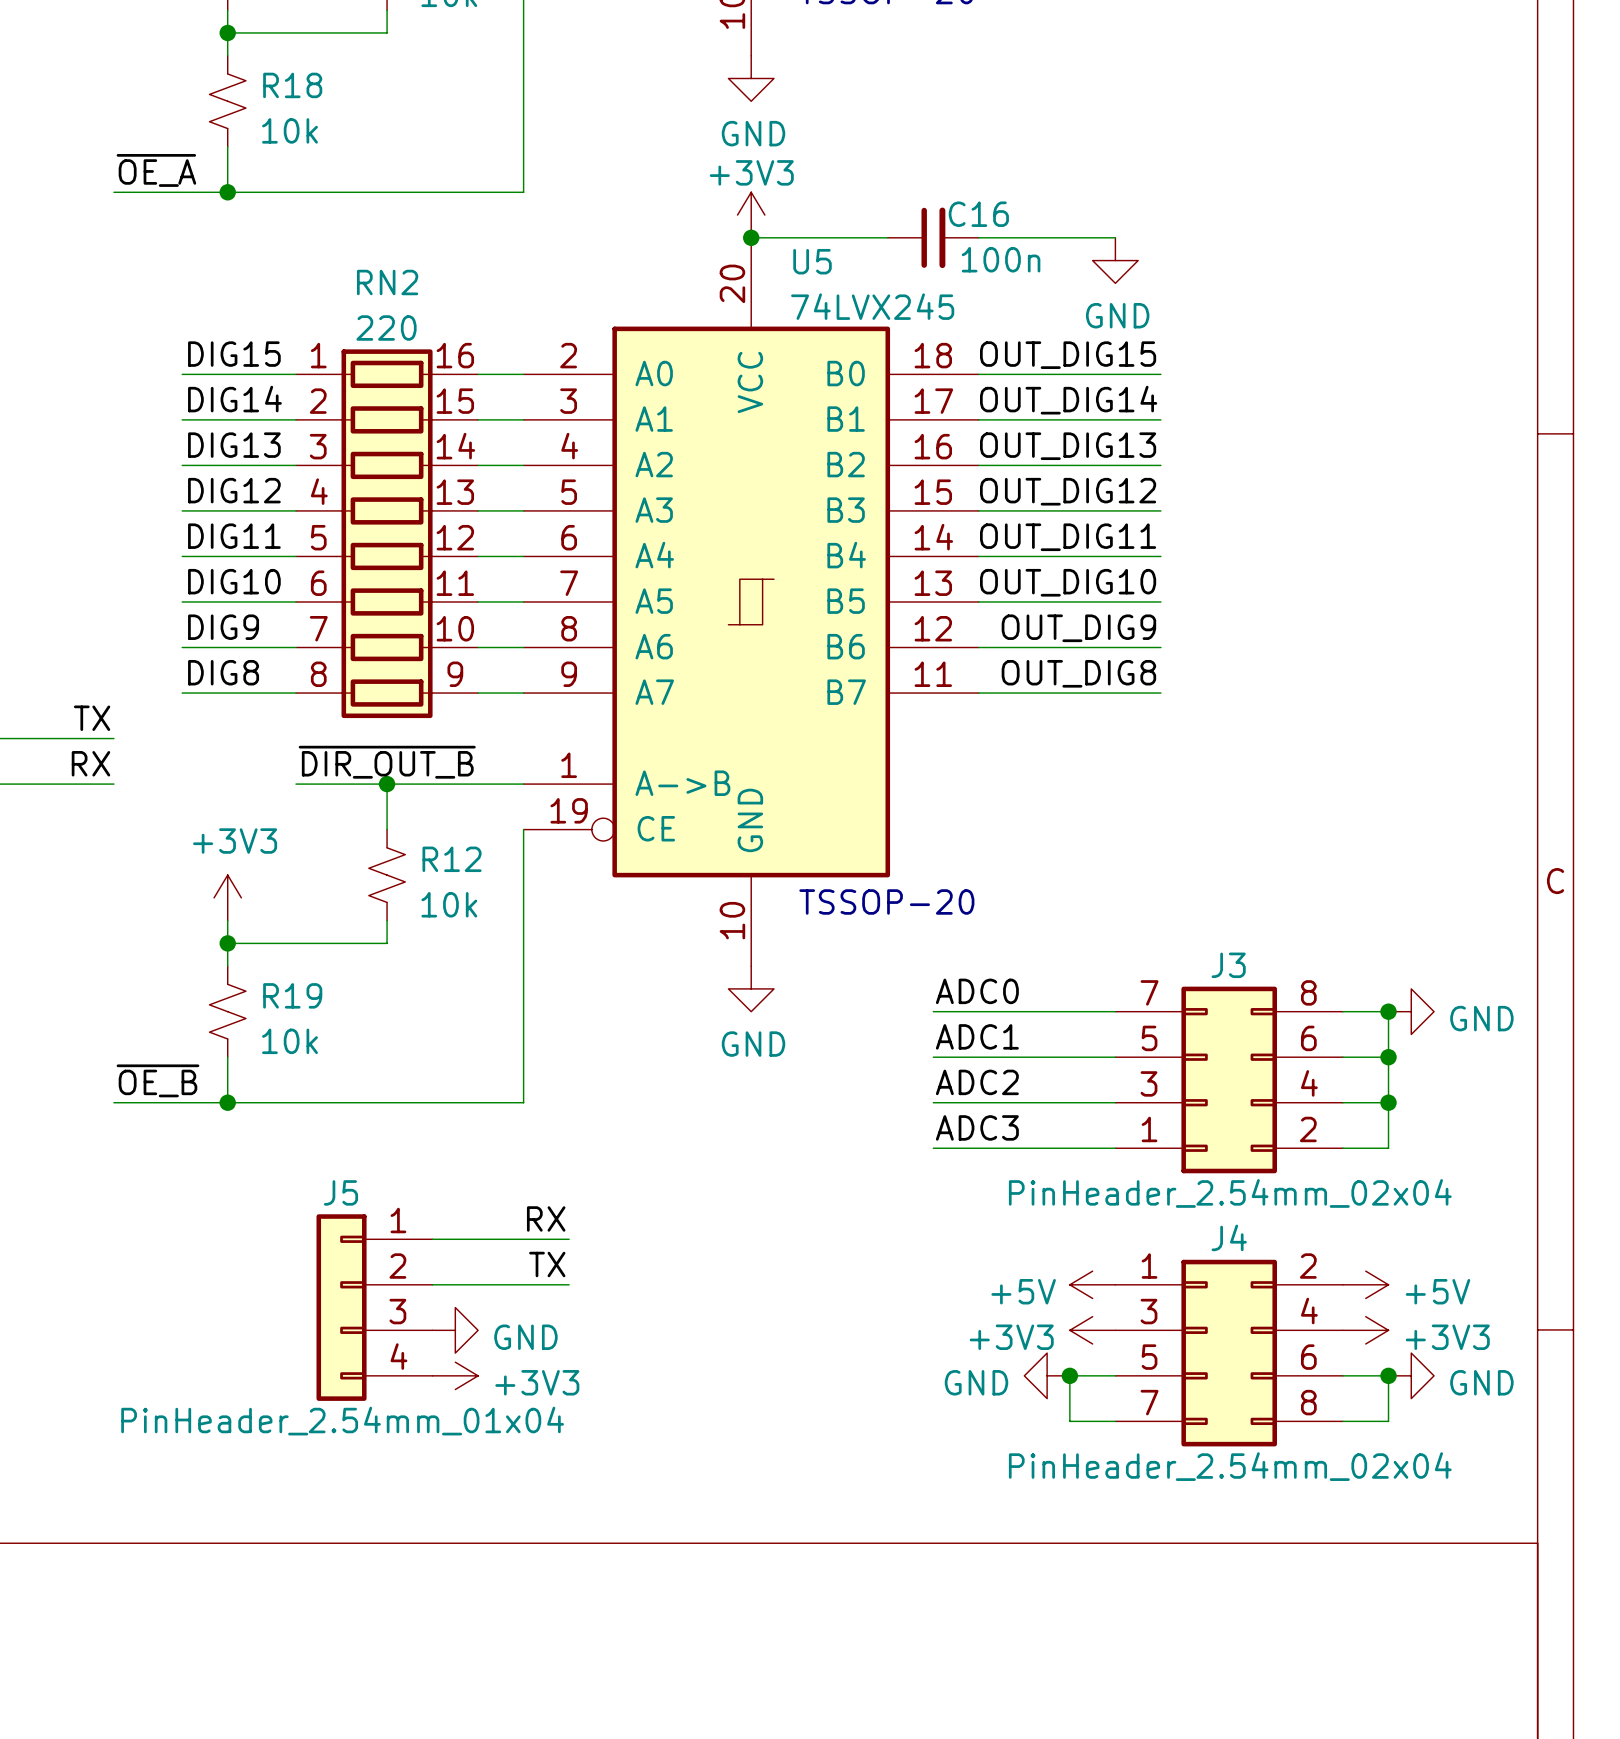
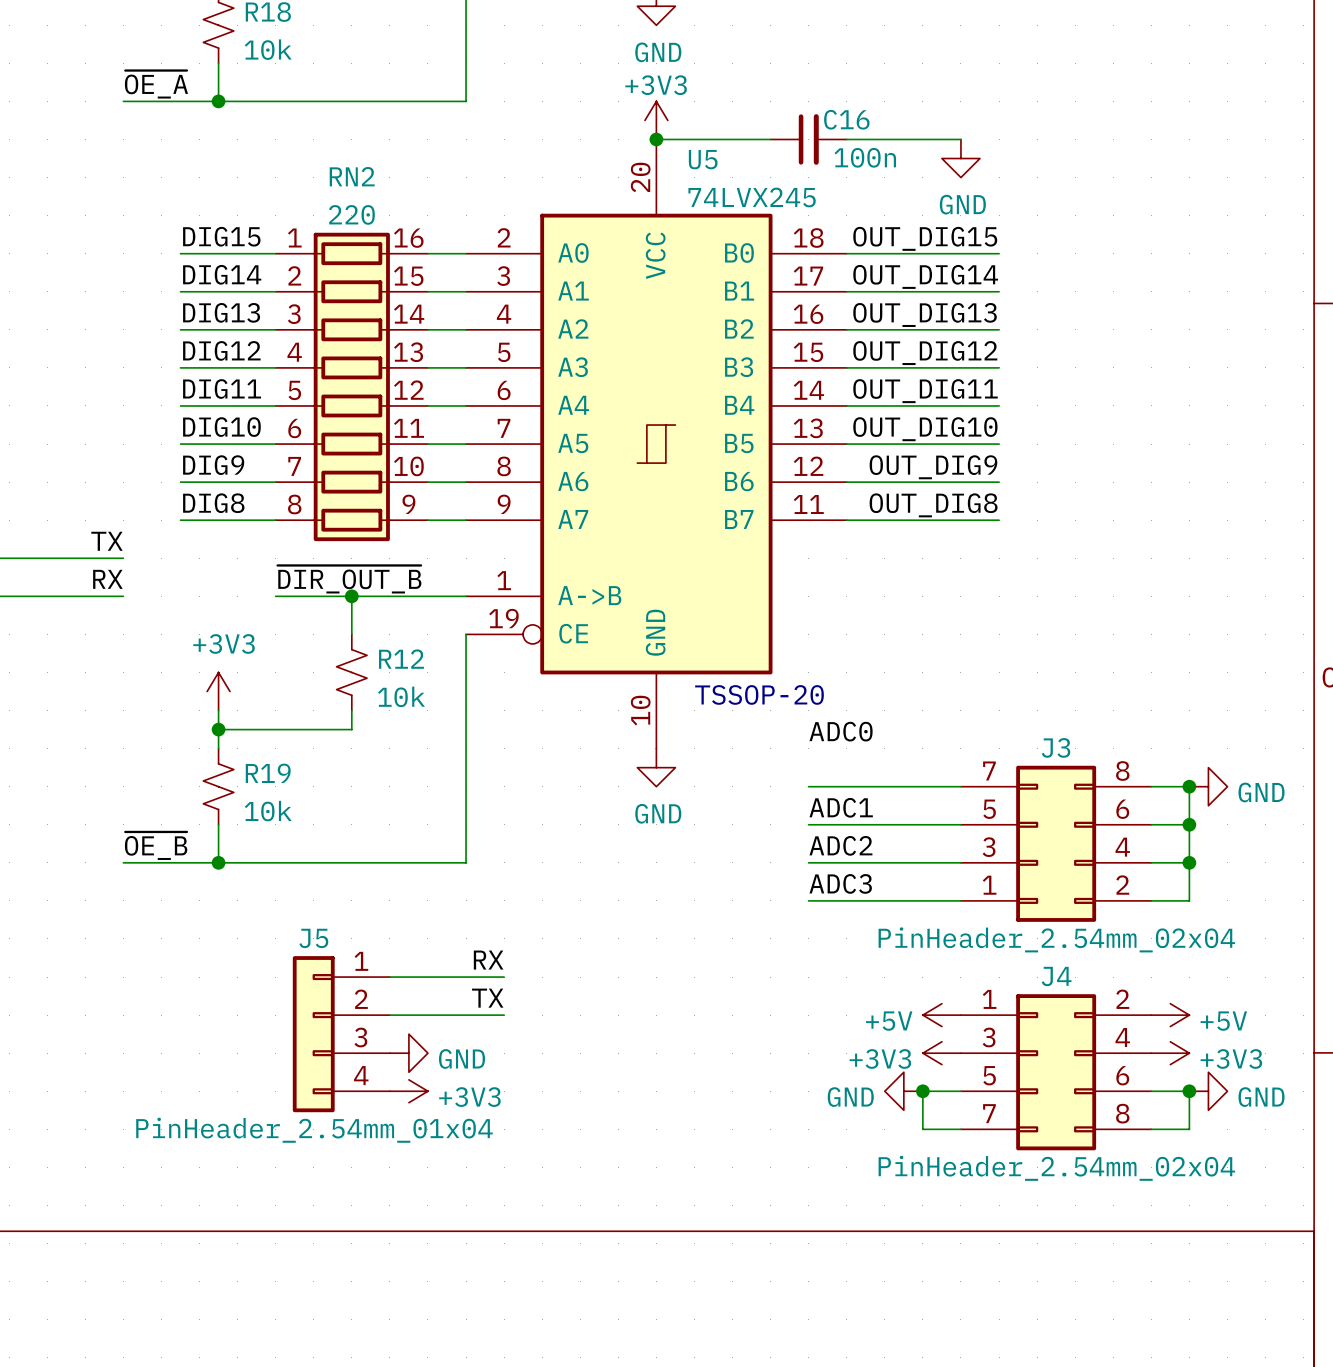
label position: ADC0 (977, 991) -> ADC0 (841, 731)

